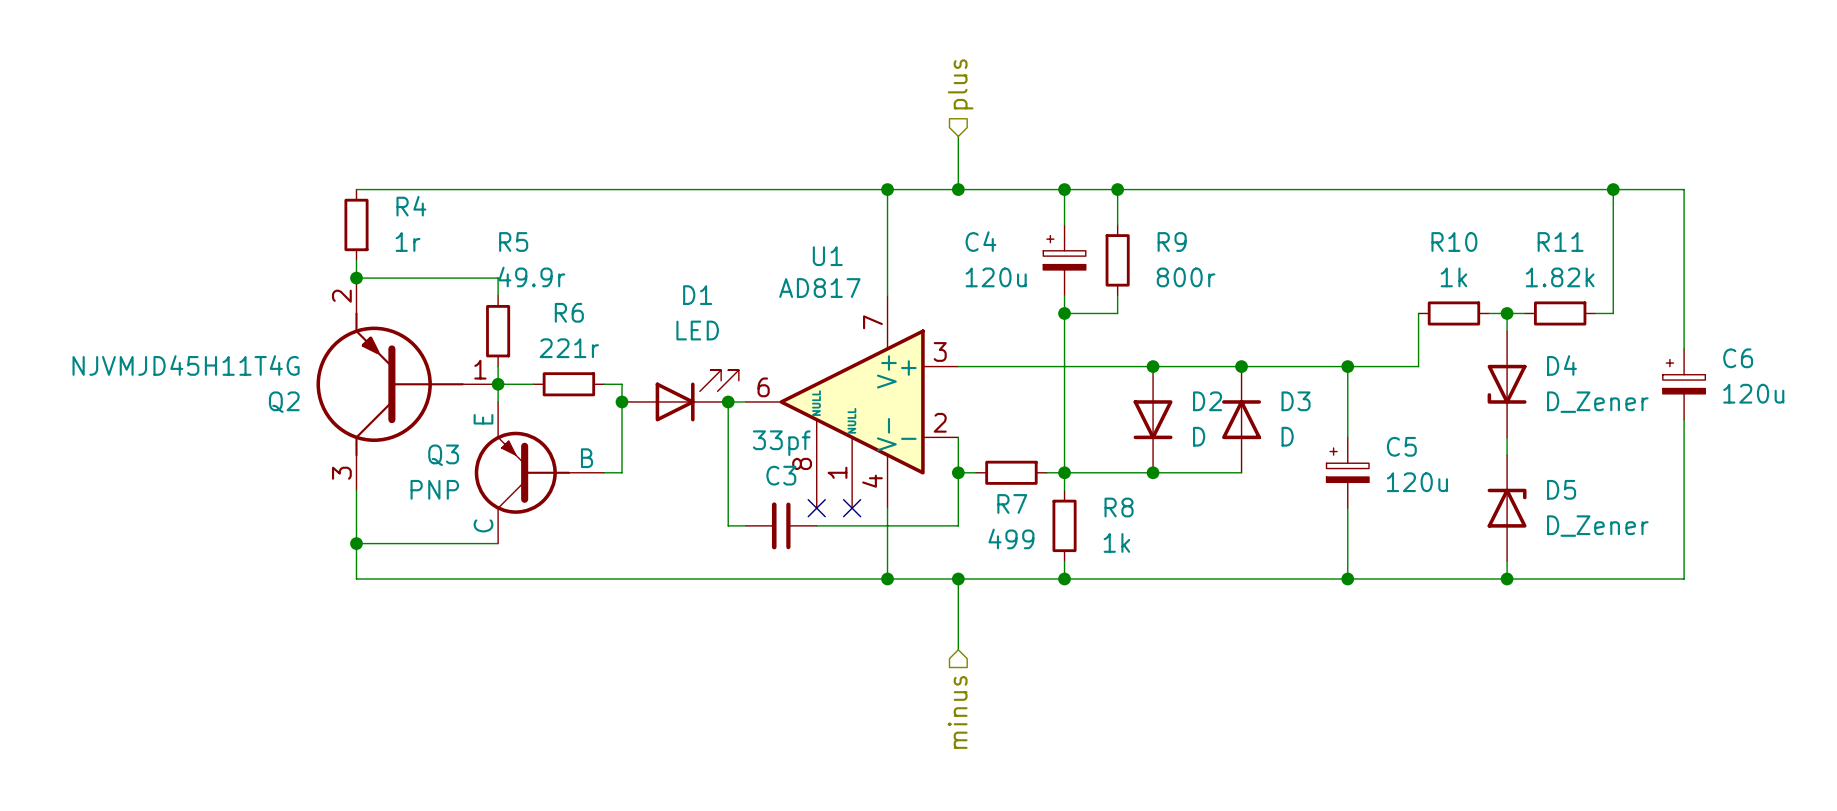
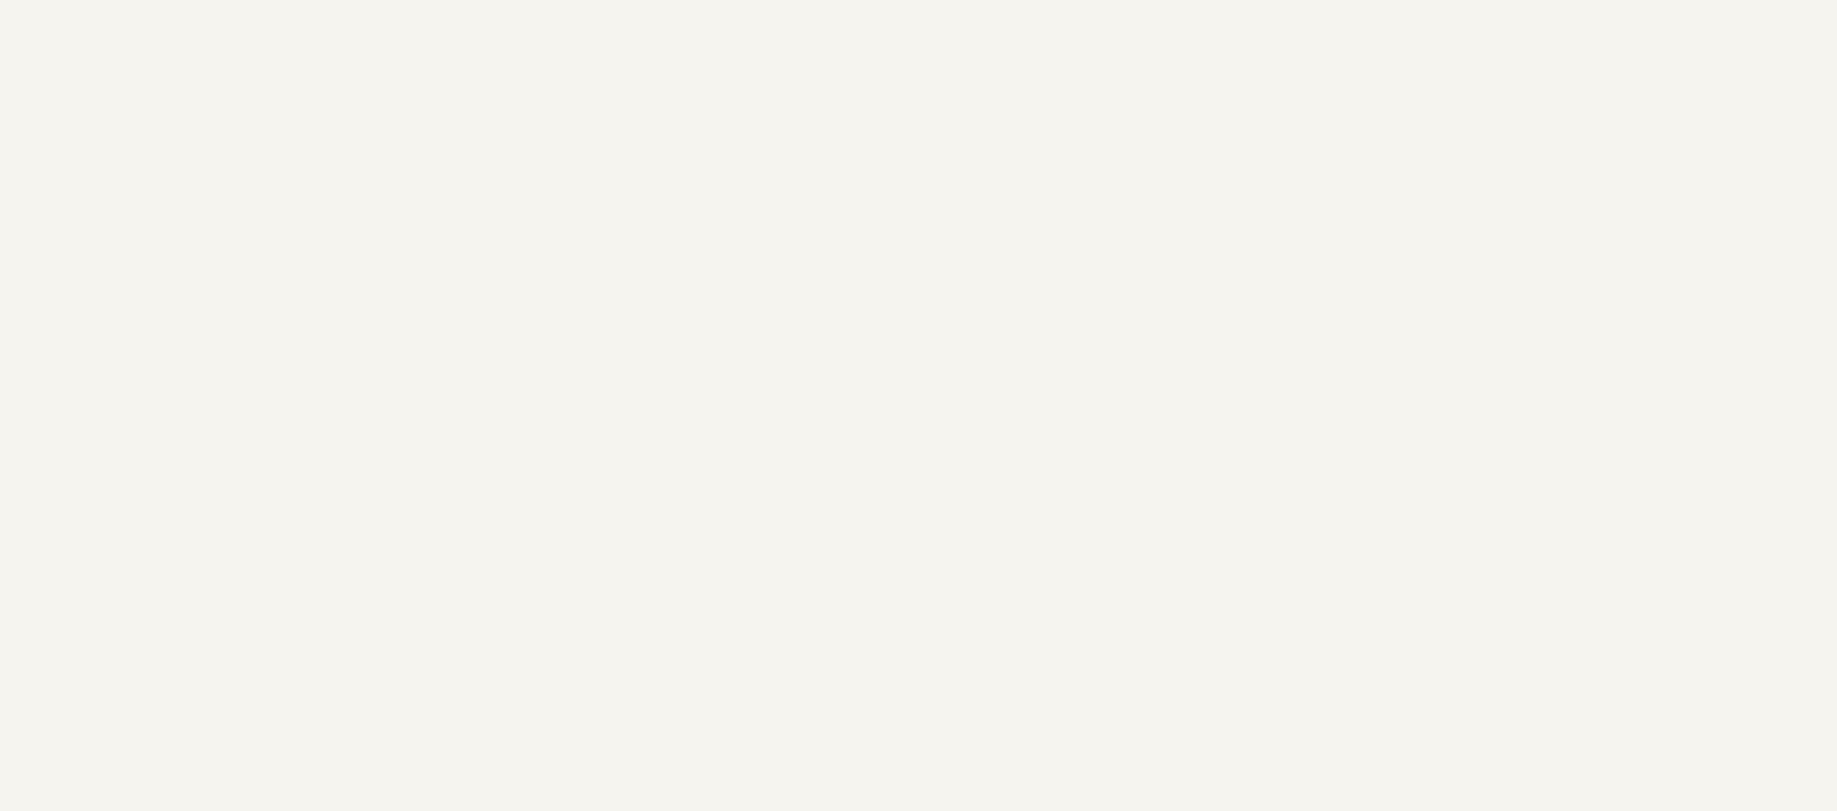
hierarchical label: plus (960, 84) -> none
wire: (958, 136) (958, 189) -> none
wire: (356, 189) (1684, 189) (1684, 348) -> none
wire: (887, 189) (887, 295) -> none
junction: (887, 189) -> none
junction: (958, 189) -> none
wire: (1064, 189) (1064, 224) -> none
junction: (1064, 189) -> none
wire: (1117, 189) (1117, 224) -> none
junction: (1117, 189) -> none
wire: (1613, 189) (1613, 313) (1595, 313) -> none
junction: (1613, 189) -> none
R4: 1r (356, 224) -> none
wire: (356, 260) (356, 278) (498, 278) (498, 295) -> none
C4: 120u (1064, 260) -> none
R9: 800r (1117, 260) -> none
junction: (356, 278) -> none
wire: (1064, 295) (1064, 490) -> none
wire: (1117, 295) (1117, 313) (1064, 313) -> none
junction: (1064, 313) -> none
wire: (1418, 313) (1418, 366) (958, 366) -> none
R10: 1k (1453, 313) -> none
wire: (1489, 313) (1524, 313) -> none
wire: (1507, 313) (1507, 331) -> none
junction: (1507, 313) -> none
R11: 1.82k (1560, 313) -> none
R5: 49.9r (498, 331) -> none
wire: (498, 366) (498, 401) -> none
junction: (1153, 366) -> none
junction: (1241, 366) -> none
wire: (1347, 366) (1347, 437) -> none
junction: (1347, 366) -> none
Q2: NJVMJD45H11T4G (407, 384) -> none
wire: (498, 384) (533, 384) -> none
junction: (498, 384) -> none
R6: 221r (568, 384) -> none
wire: (604, 384) (622, 384) (622, 472) (604, 472) -> none
D4: D_Zener (1507, 384) -> none
C6: 120u (1684, 384) -> none
D1: LED (680, 395) -> none
junction: (622, 401) -> none
junction: (728, 401) -> none
wire: (745, 401) (728, 401) (728, 525) (745, 525) -> none
U1: AD817 (852, 401) -> none
D2: D (1153, 419) -> none
D3: D (1241, 419) -> none
wire: (1684, 419) (1684, 578) (356, 578) (356, 490) -> none
wire: (958, 437) (958, 525) (816, 525) -> none
wire: (1507, 437) (1507, 455) -> none
Q3: PNP (539, 472) -> none
wire: (958, 472) (976, 472) -> none
junction: (958, 472) -> none
R7: 499 (1011, 472) -> none
wire: (1046, 472) (1241, 472) -> none
junction: (1064, 472) -> none
junction: (1153, 472) -> none
C5: 120u (1347, 472) -> none
no-connect mark: (816, 508) -> none
no-connect mark: (852, 508) -> none
wire: (887, 508) (887, 578) -> none
wire: (1347, 508) (1347, 578) -> none
D5: D_Zener (1507, 508) -> none
C3: 33pf (781, 525) -> none
R8: 1k (1064, 525) -> none
wire: (356, 543) (498, 543) -> none
junction: (356, 543) -> none
wire: (1064, 561) (1064, 578) -> none
wire: (1507, 561) (1507, 578) -> none
junction: (887, 578) -> none
wire: (958, 578) (958, 649) -> none
junction: (958, 578) -> none
junction: (1064, 578) -> none
junction: (1347, 578) -> none
junction: (1507, 578) -> none
hierarchical label: minus (957, 712) -> none

